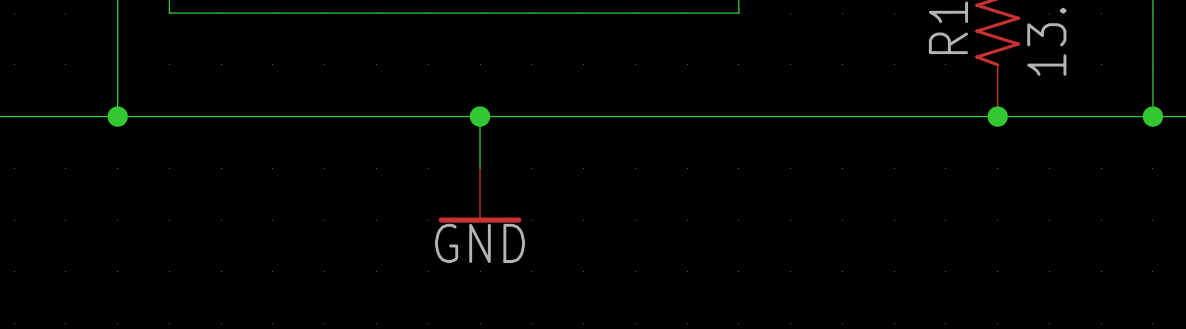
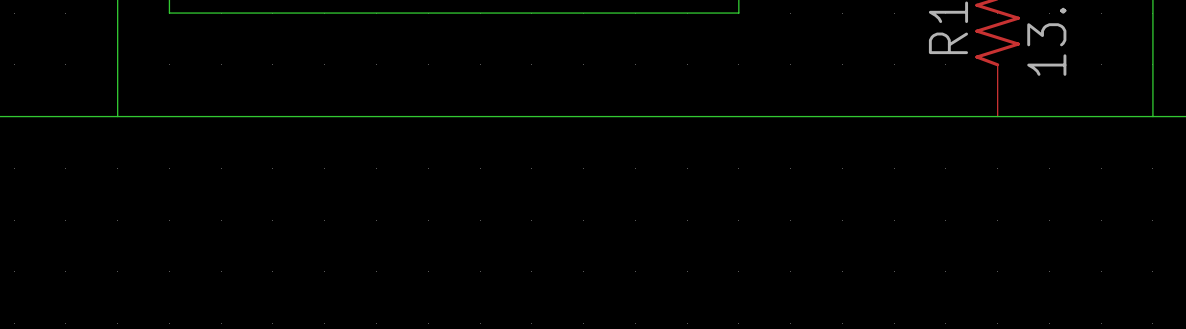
junction: (117, 116) -> none
wire: (480, 116) (480, 168) -> none
junction: (480, 116) -> none
junction: (997, 116) -> none
junction: (1152, 116) -> none
power symbol: GND (480, 195) -> none

